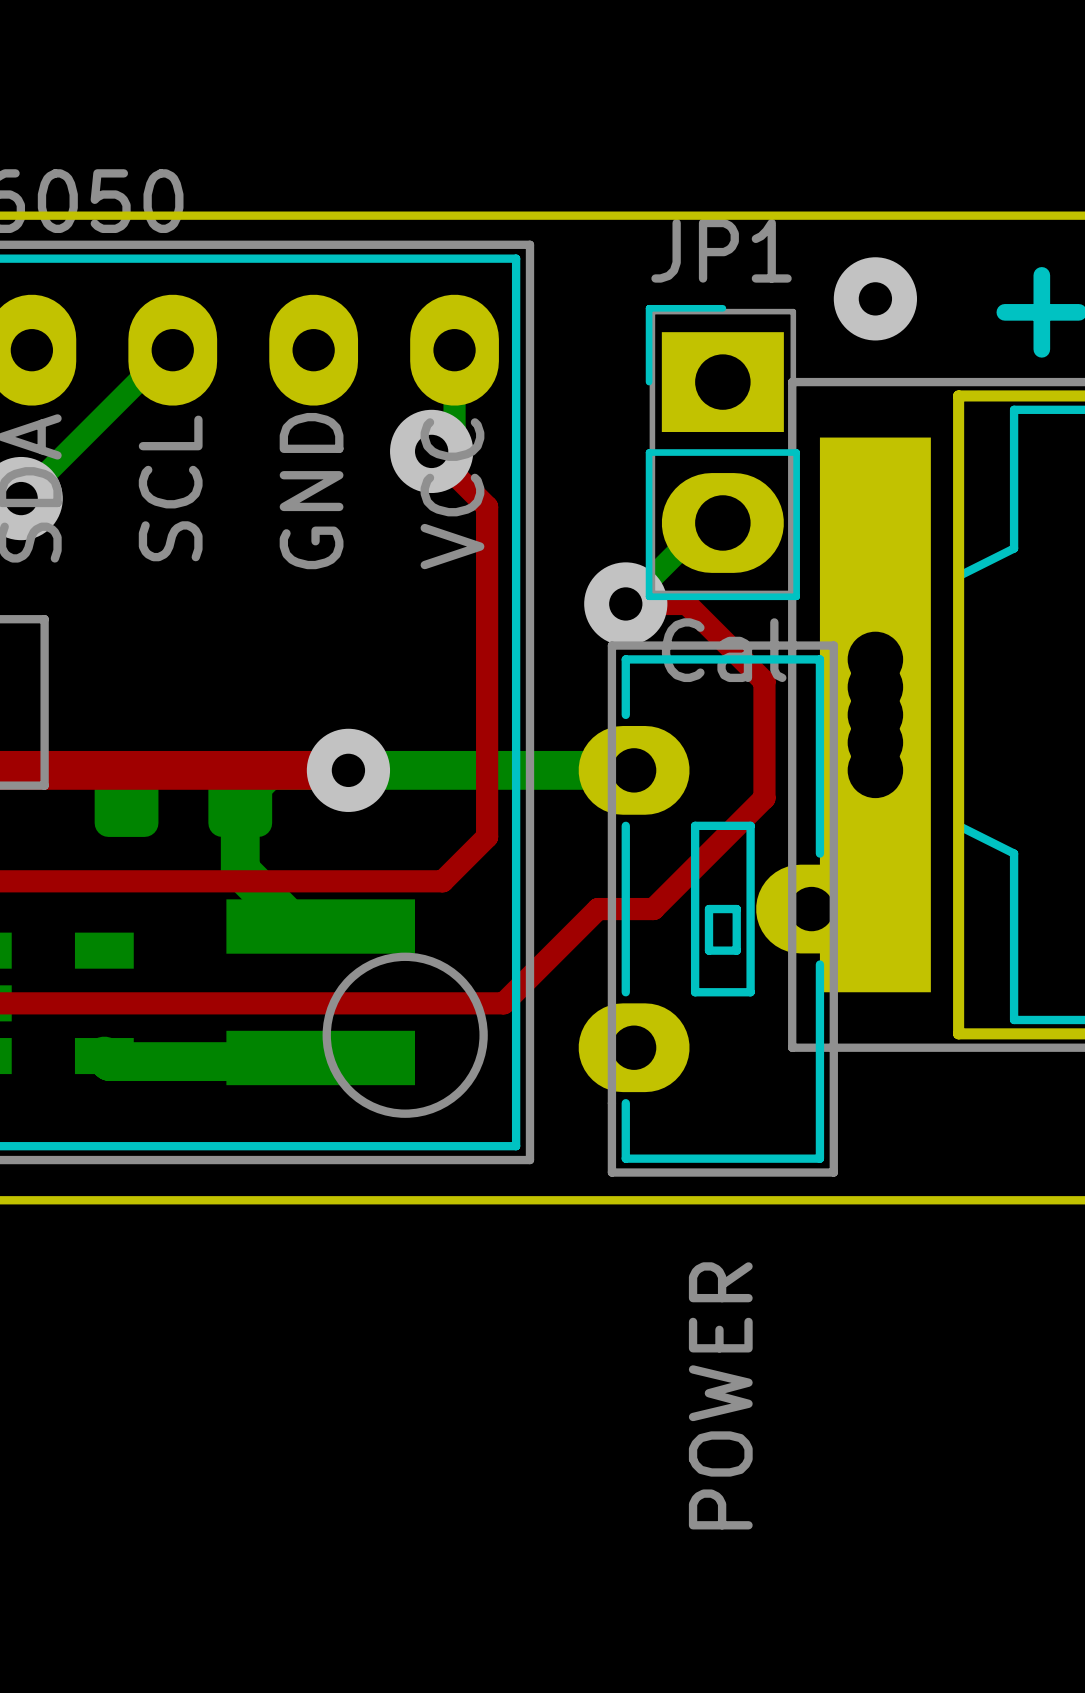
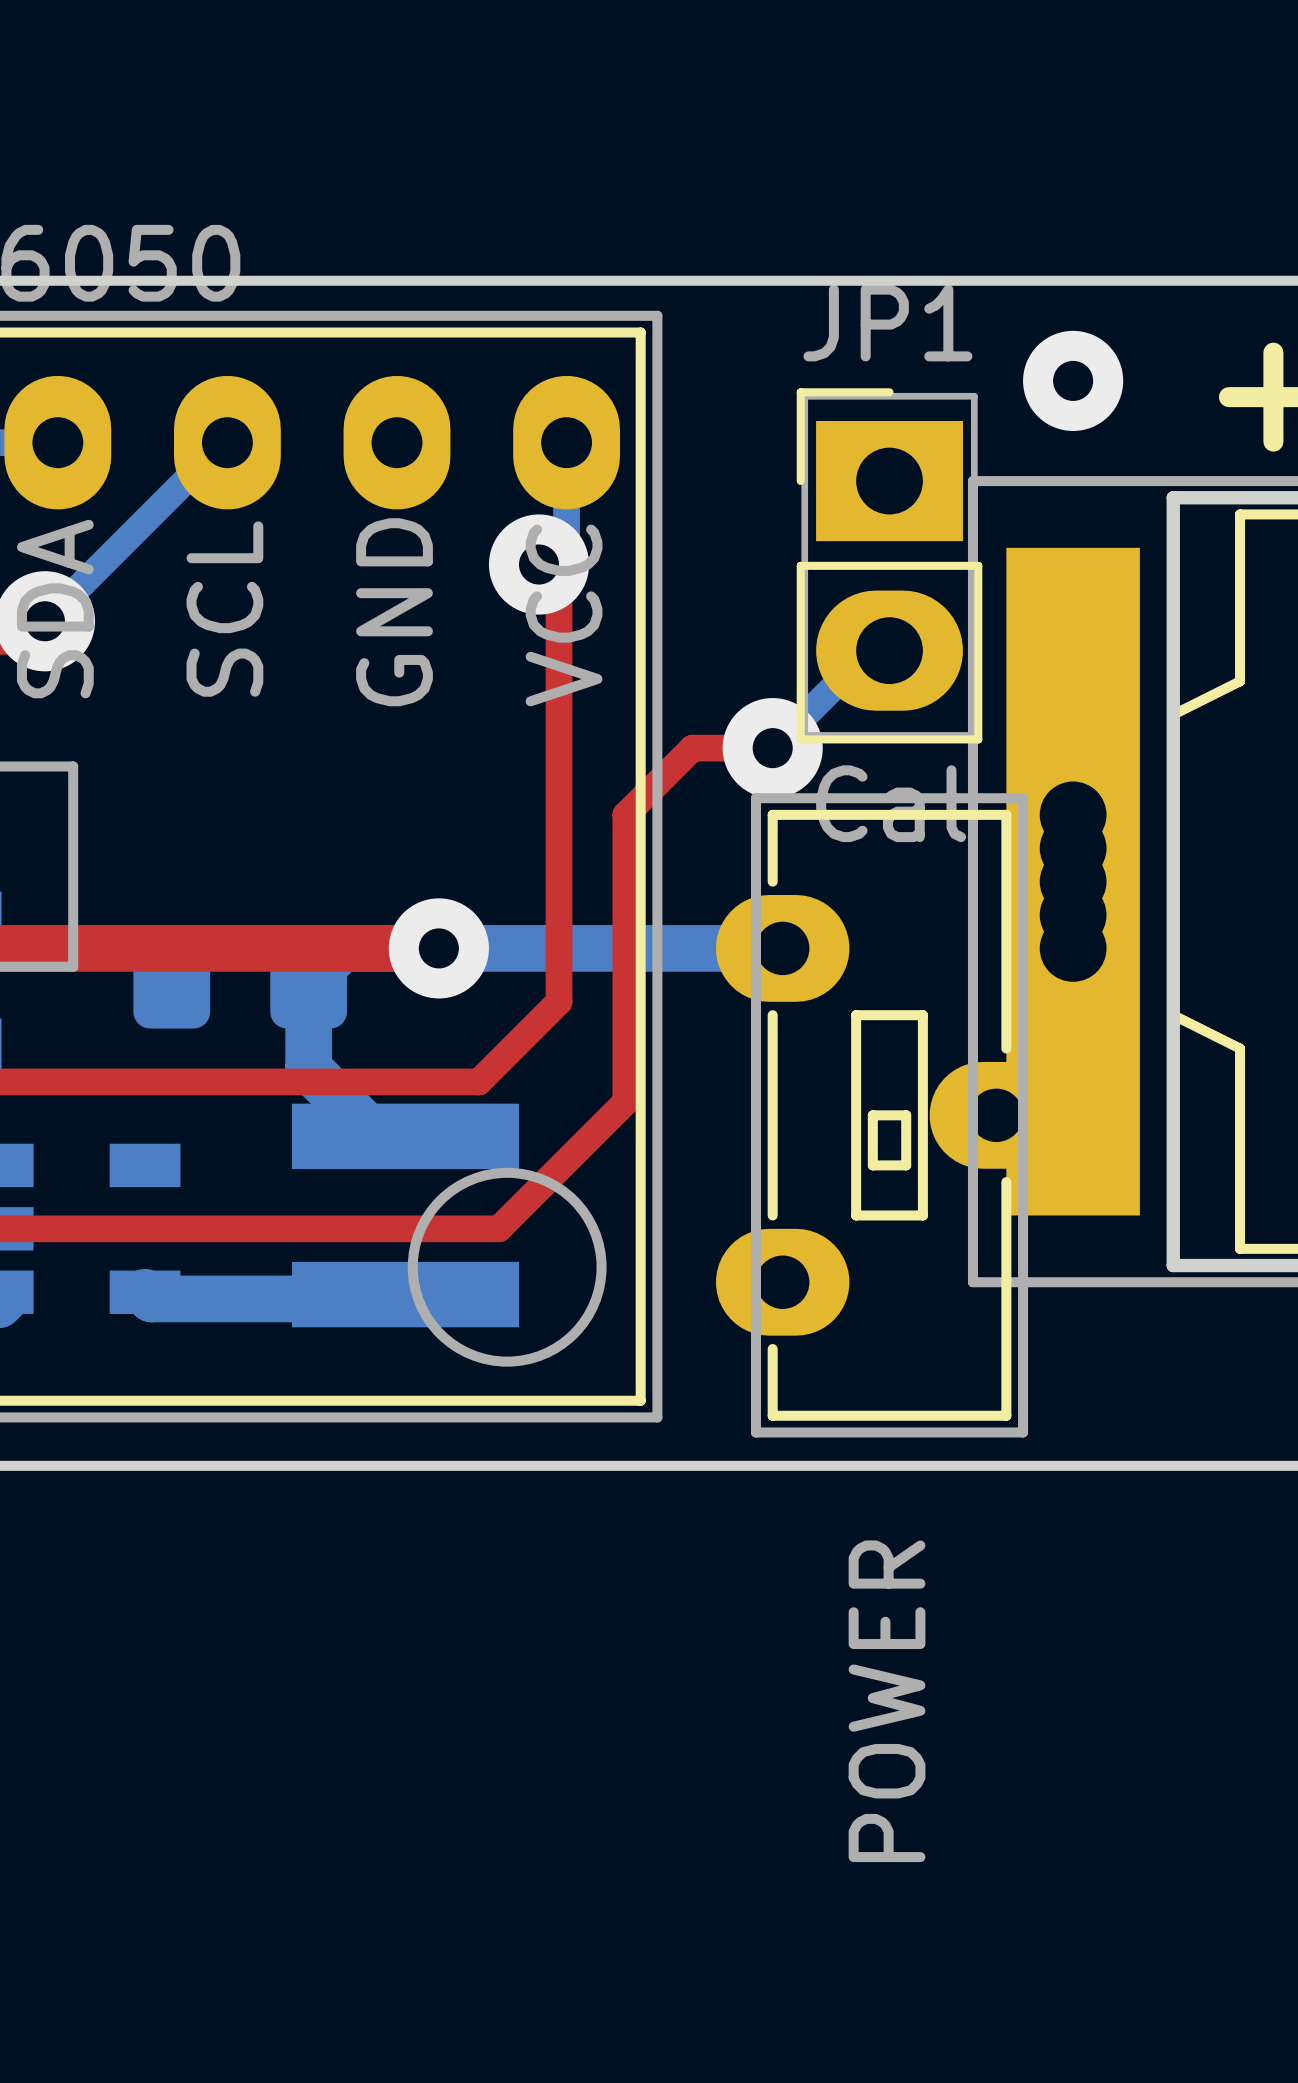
top track: (448, 468) (487, 506) (487, 836) (442, 881) (381, 881) -> (559, 584) (559, 1001) (478, 1081)
top track: (625, 603) (686, 603) (764, 681) (764, 798) (653, 909) (598, 909) (503, 1003) (398, 1003) -> (772, 748) (692, 748) (625, 814) (625, 1101) (498, 1228)

